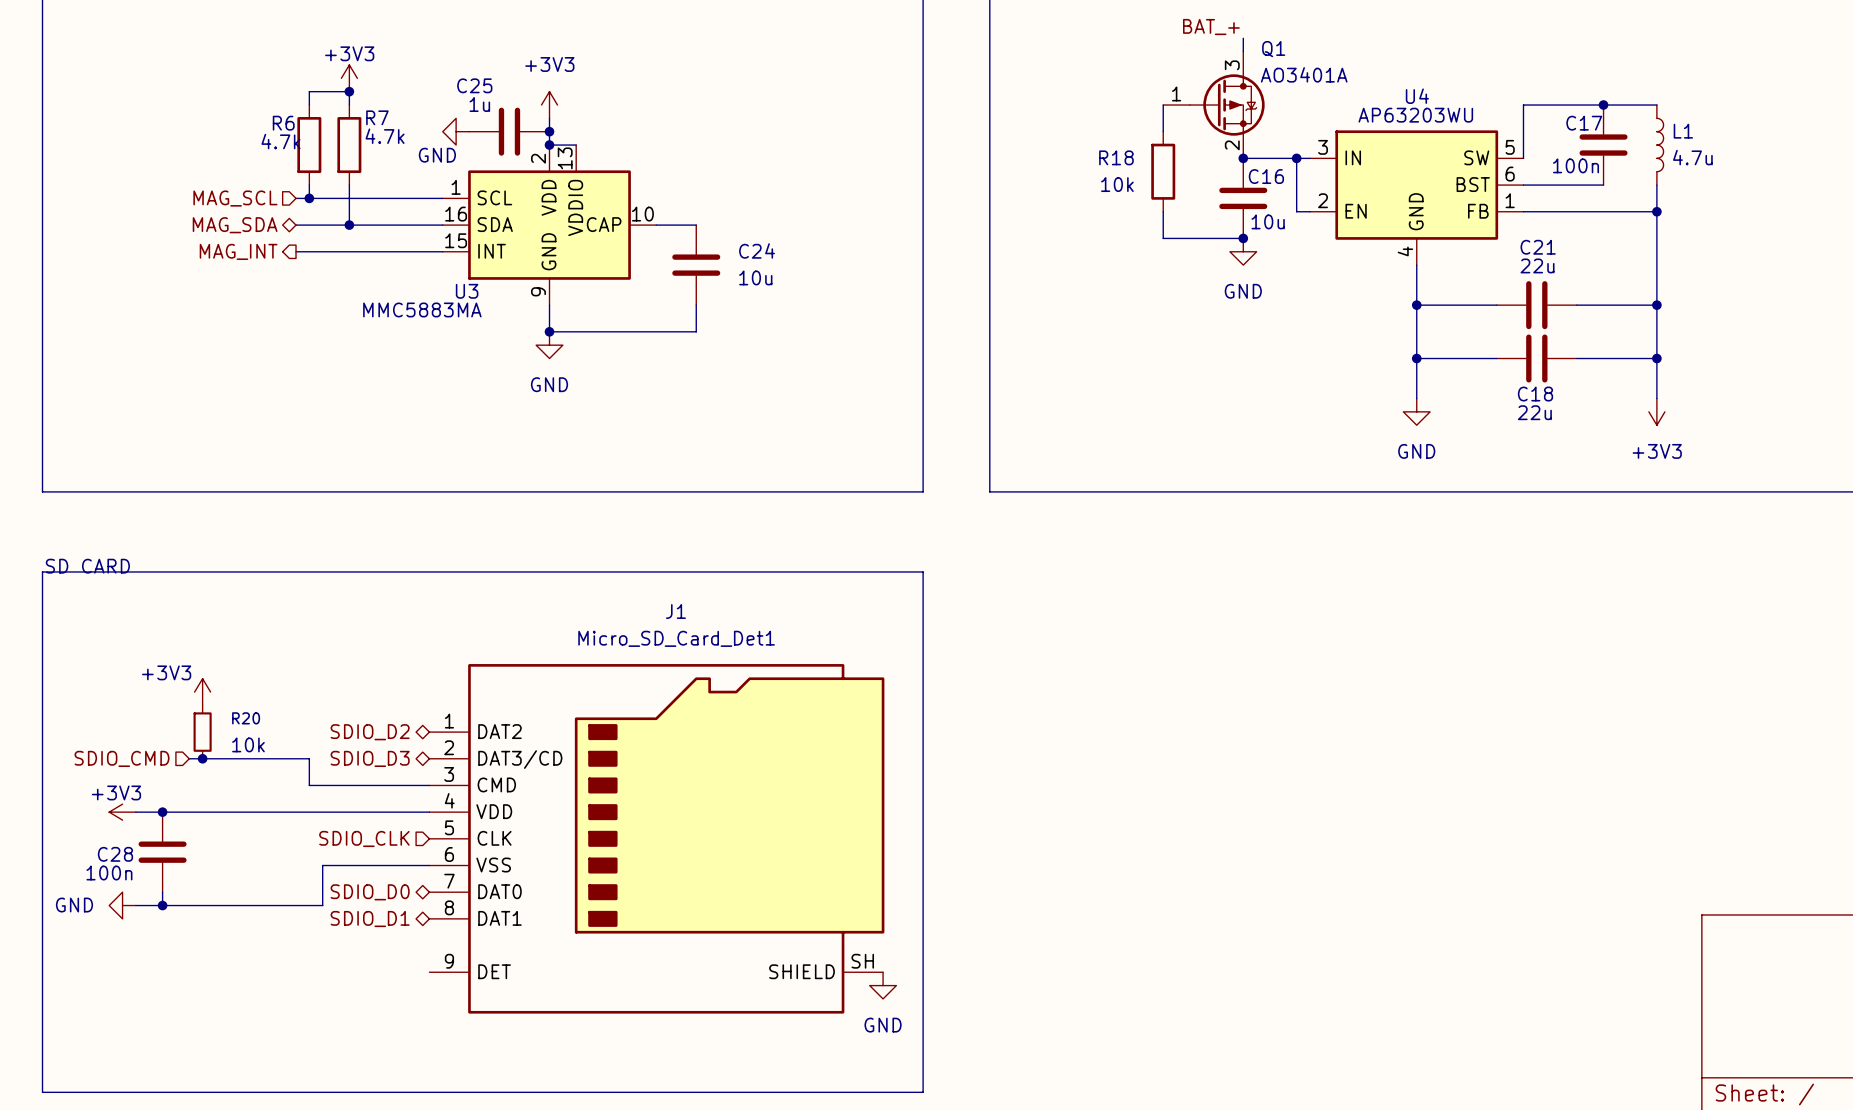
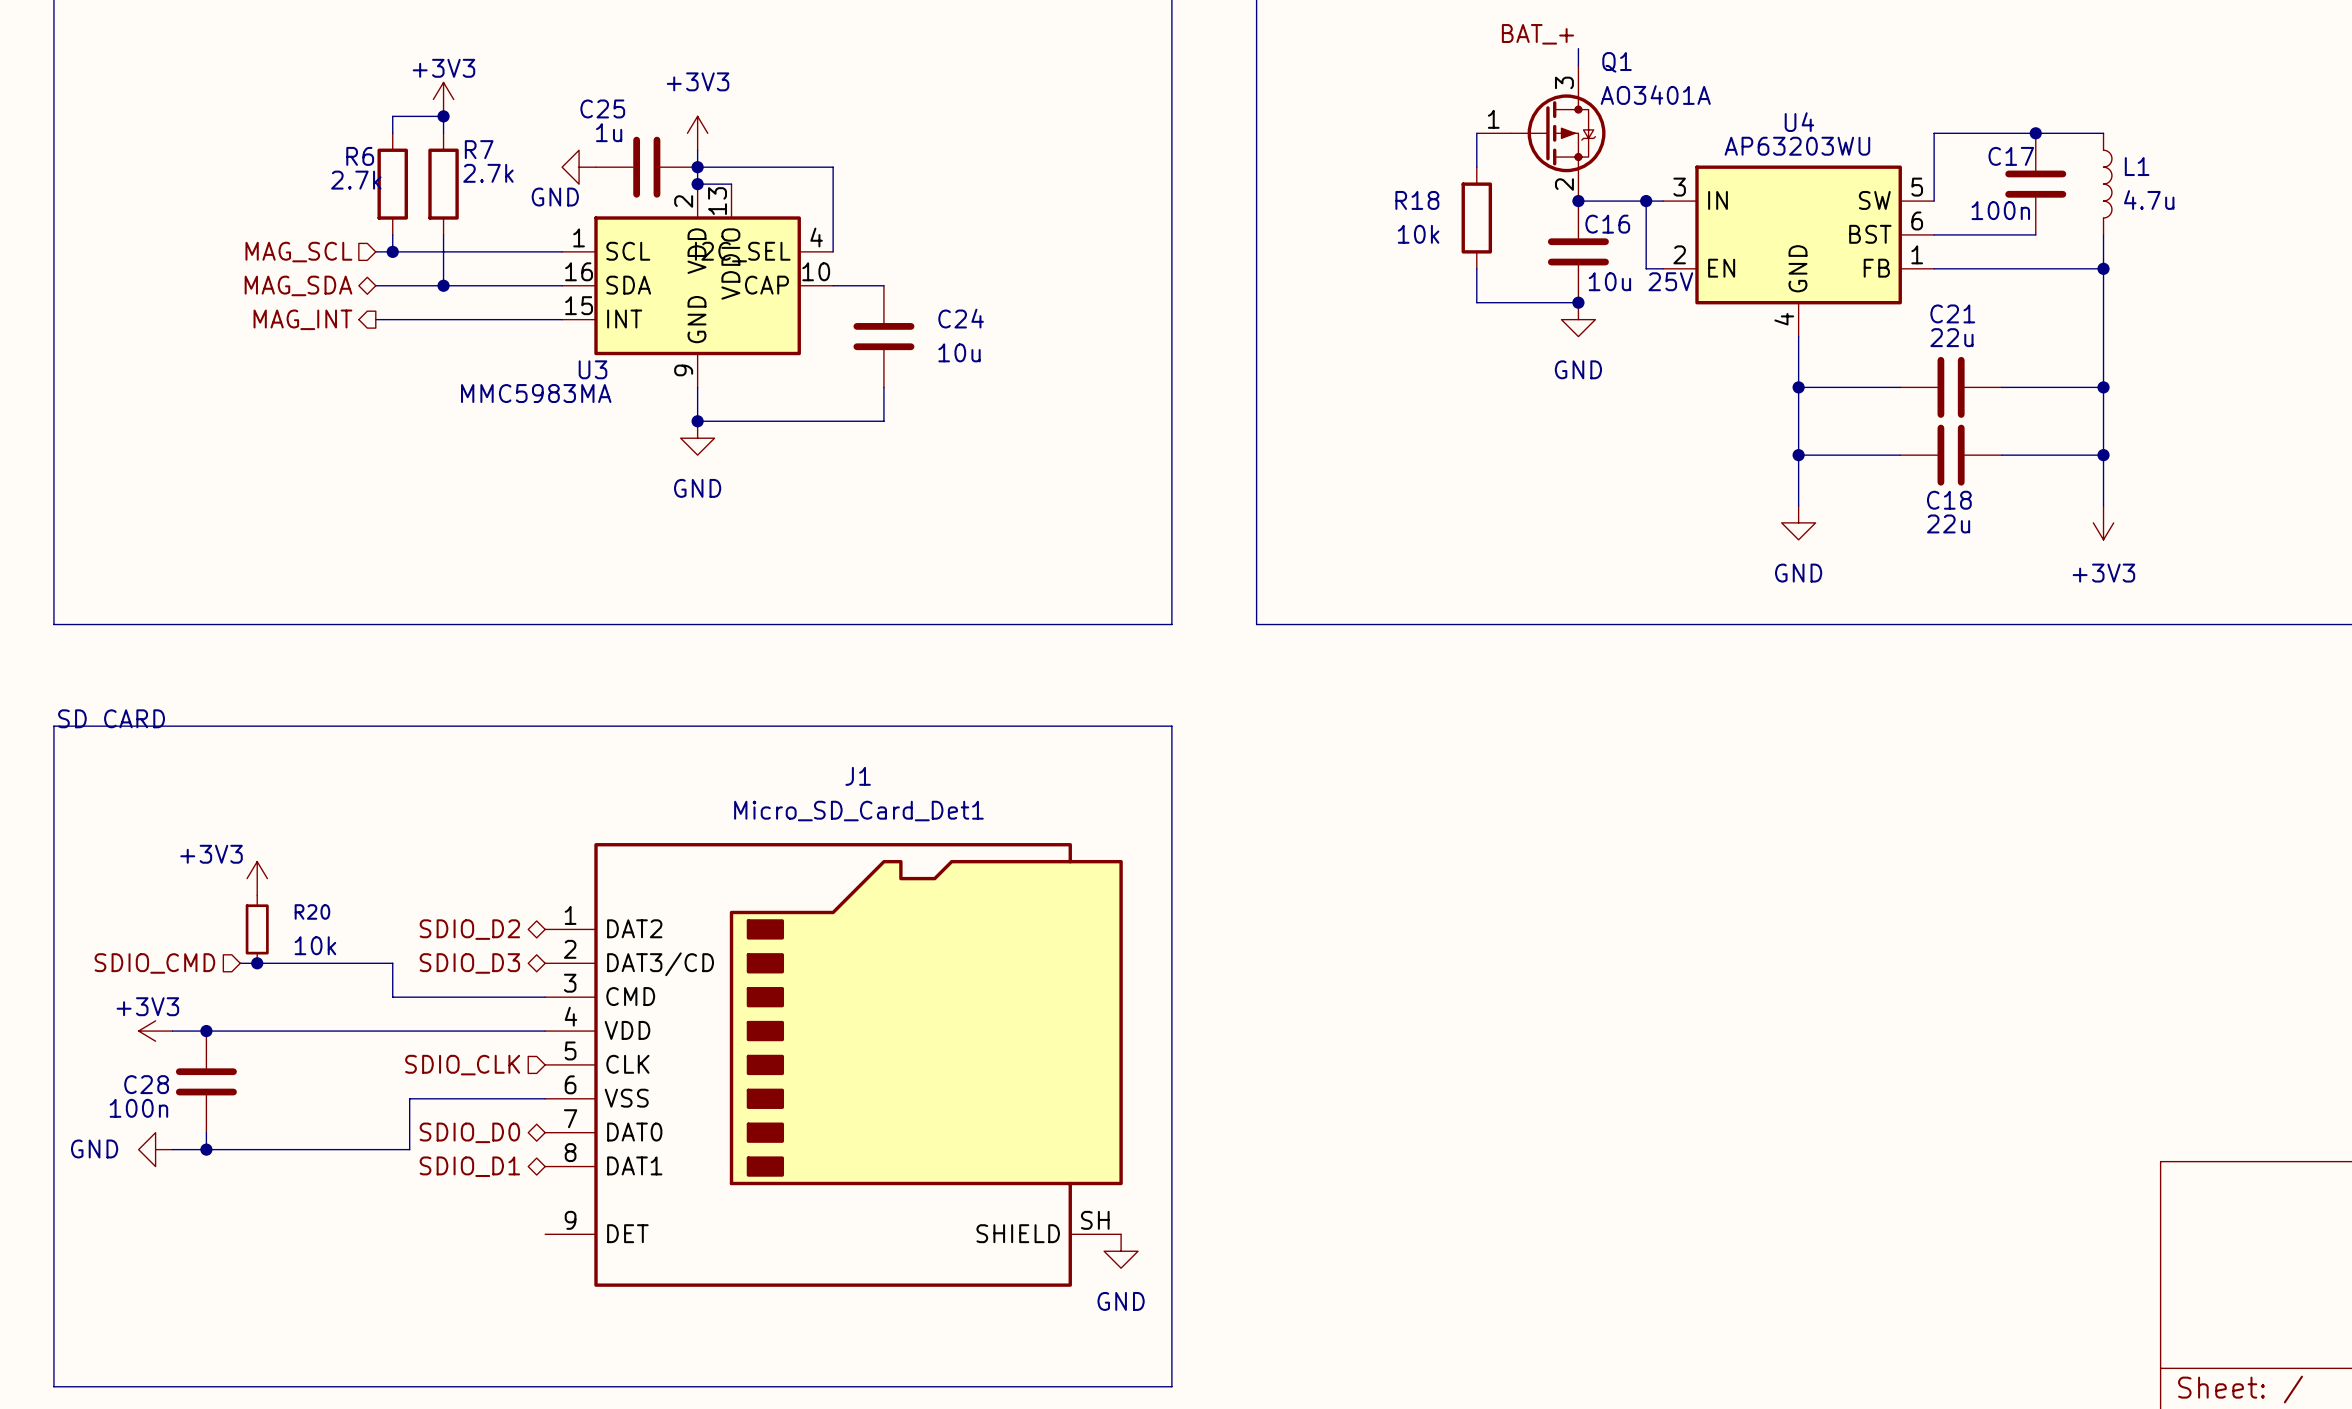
wire: none -> (697, 167) (833, 167) (833, 251)
R7 value: 4.7k (385, 136) -> 2.7k (488, 173)
R6 value: 4.7k (280, 141) -> 2.7k (356, 180)
U3 symbol: [442, 145, 657, 306] -> [562, 184, 834, 388]
C16 value: 10u (1268, 221) -> 10u 25V (1640, 281)
U3 value: MMC5883MA (422, 309) -> MMC5983MA (536, 393)

